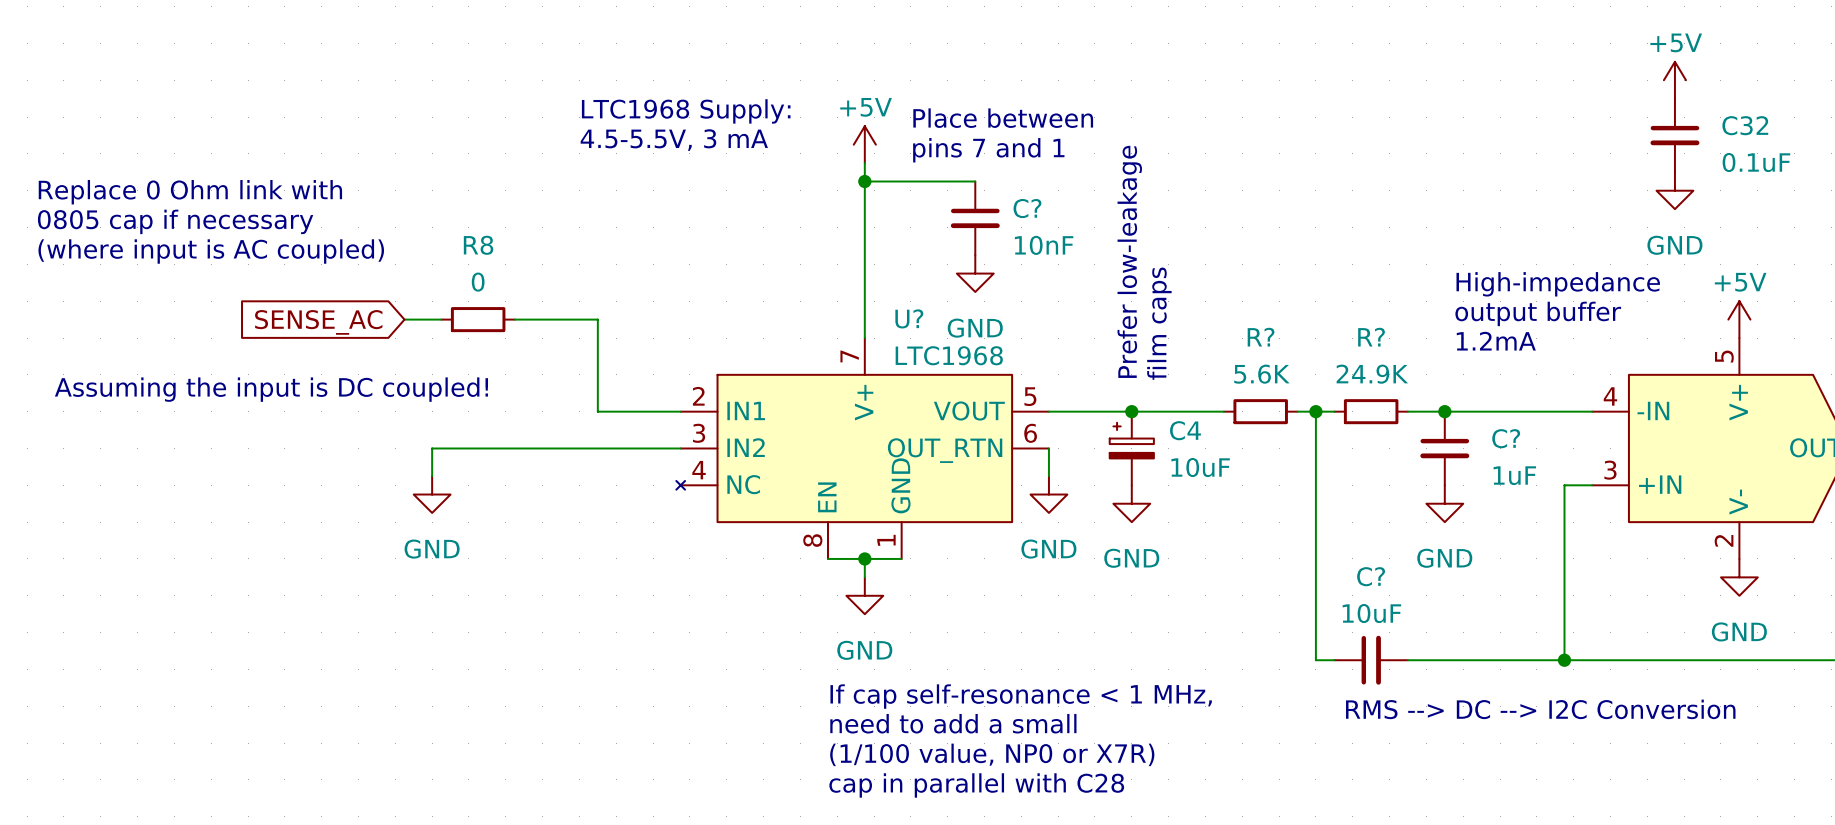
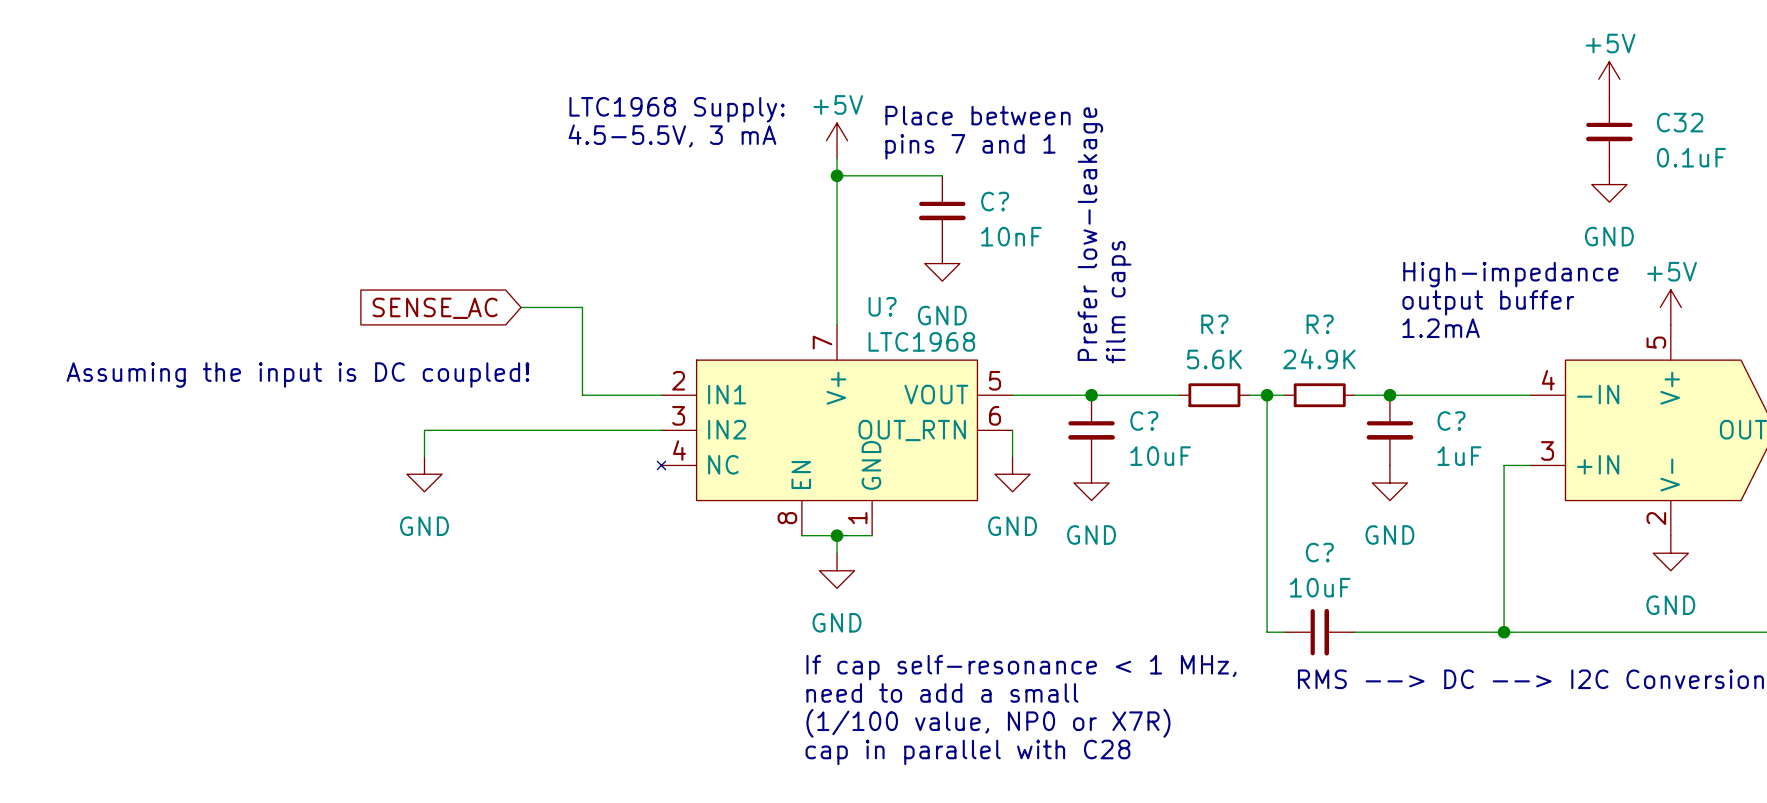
text: Replace 0 Ohm link with (190, 192) -> none
text: 0805 cap if necessary (175, 221) -> none
text: (where input is AC coupled) (211, 251) -> none
R8: 0 (478, 319) -> none
wire: (514, 319) (533, 319) -> none
global label position: SENSE_AC (318, 322) -> SENSE_AC (435, 308)
C4: 10uF (1131, 448) -> none
C?: none -> 10uF (1091, 430)

